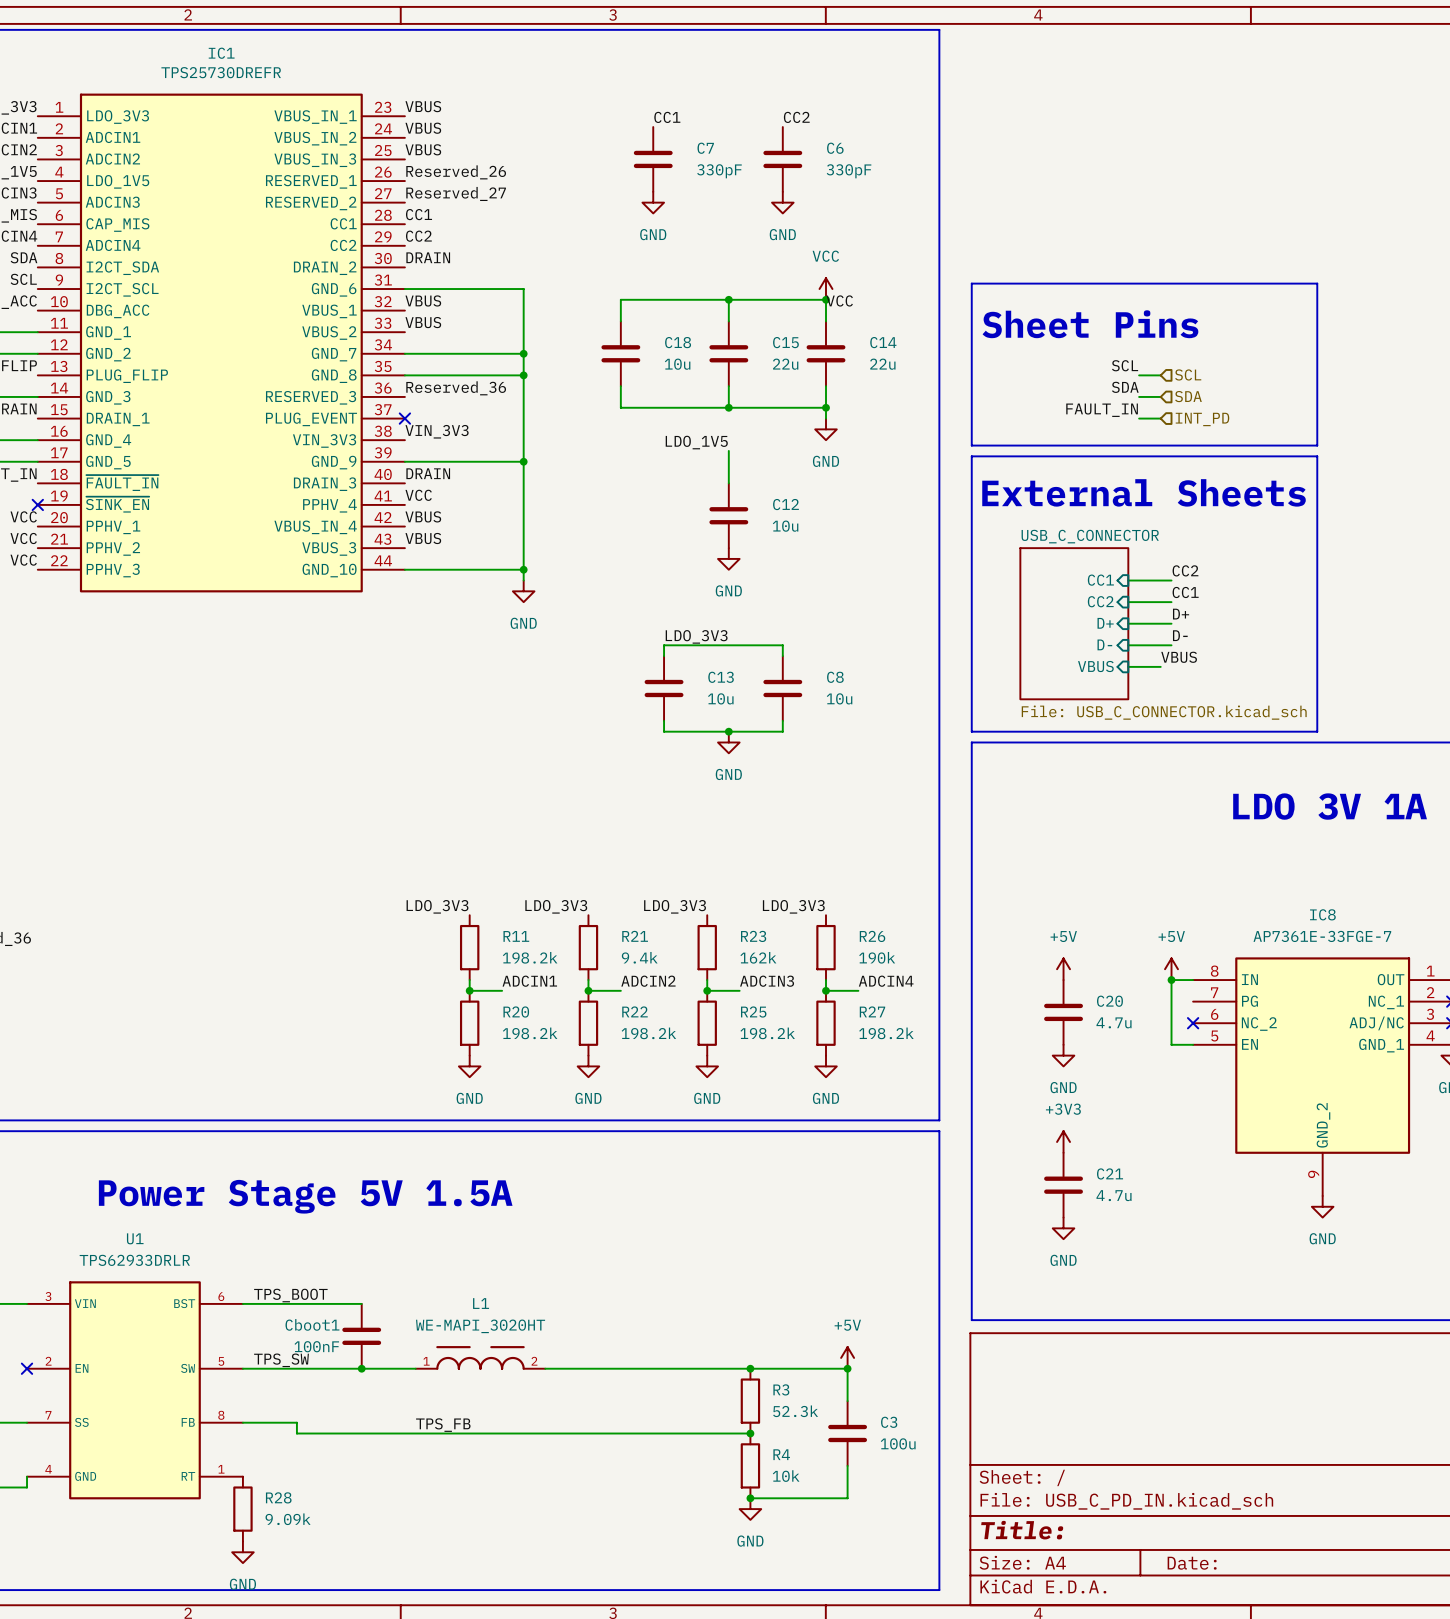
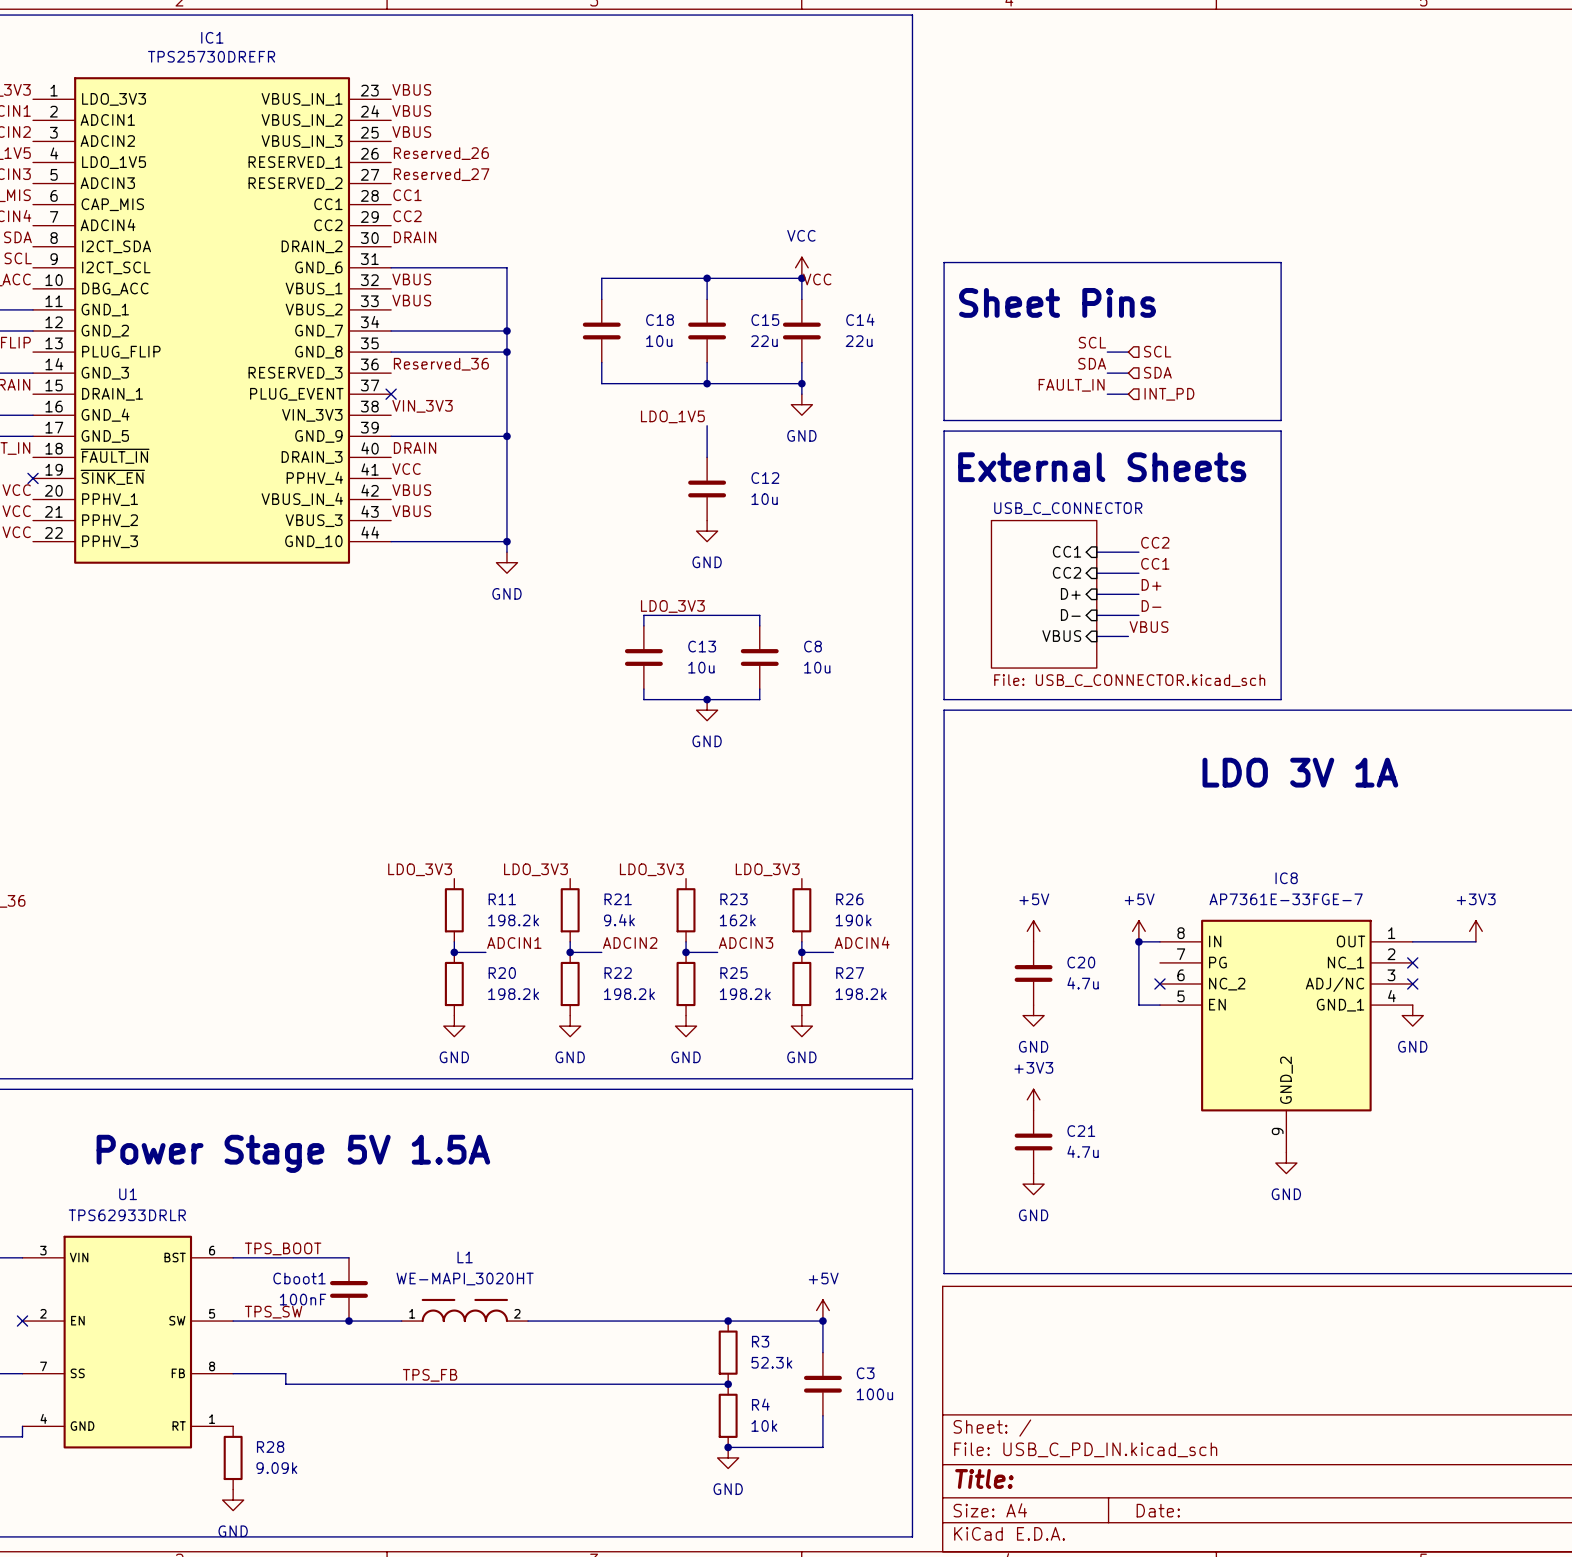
label: CC1 (667, 117) -> none
label: CC2 (796, 117) -> none
C7: 330pF (653, 159) -> none
C6: 330pF (782, 159) -> none
power symbol: GND (653, 202) -> none
power symbol: GND (782, 202) -> none

